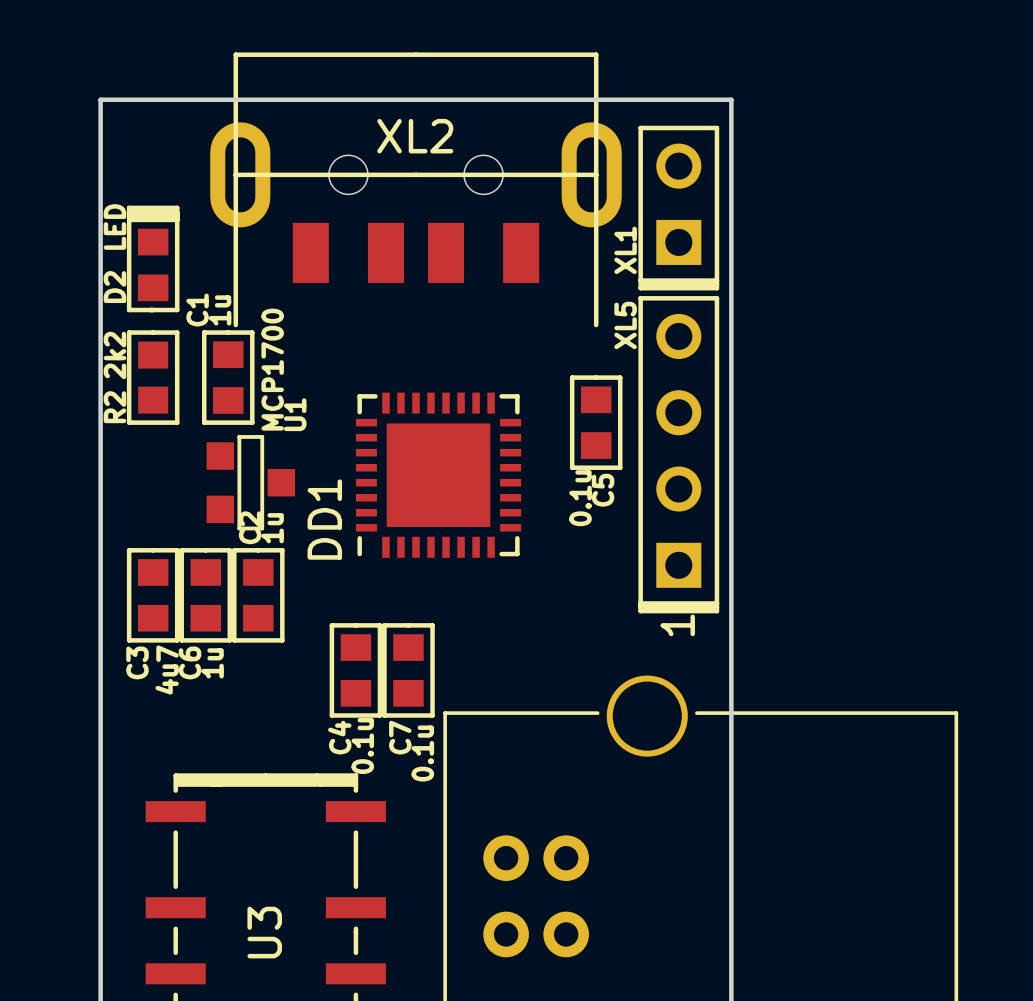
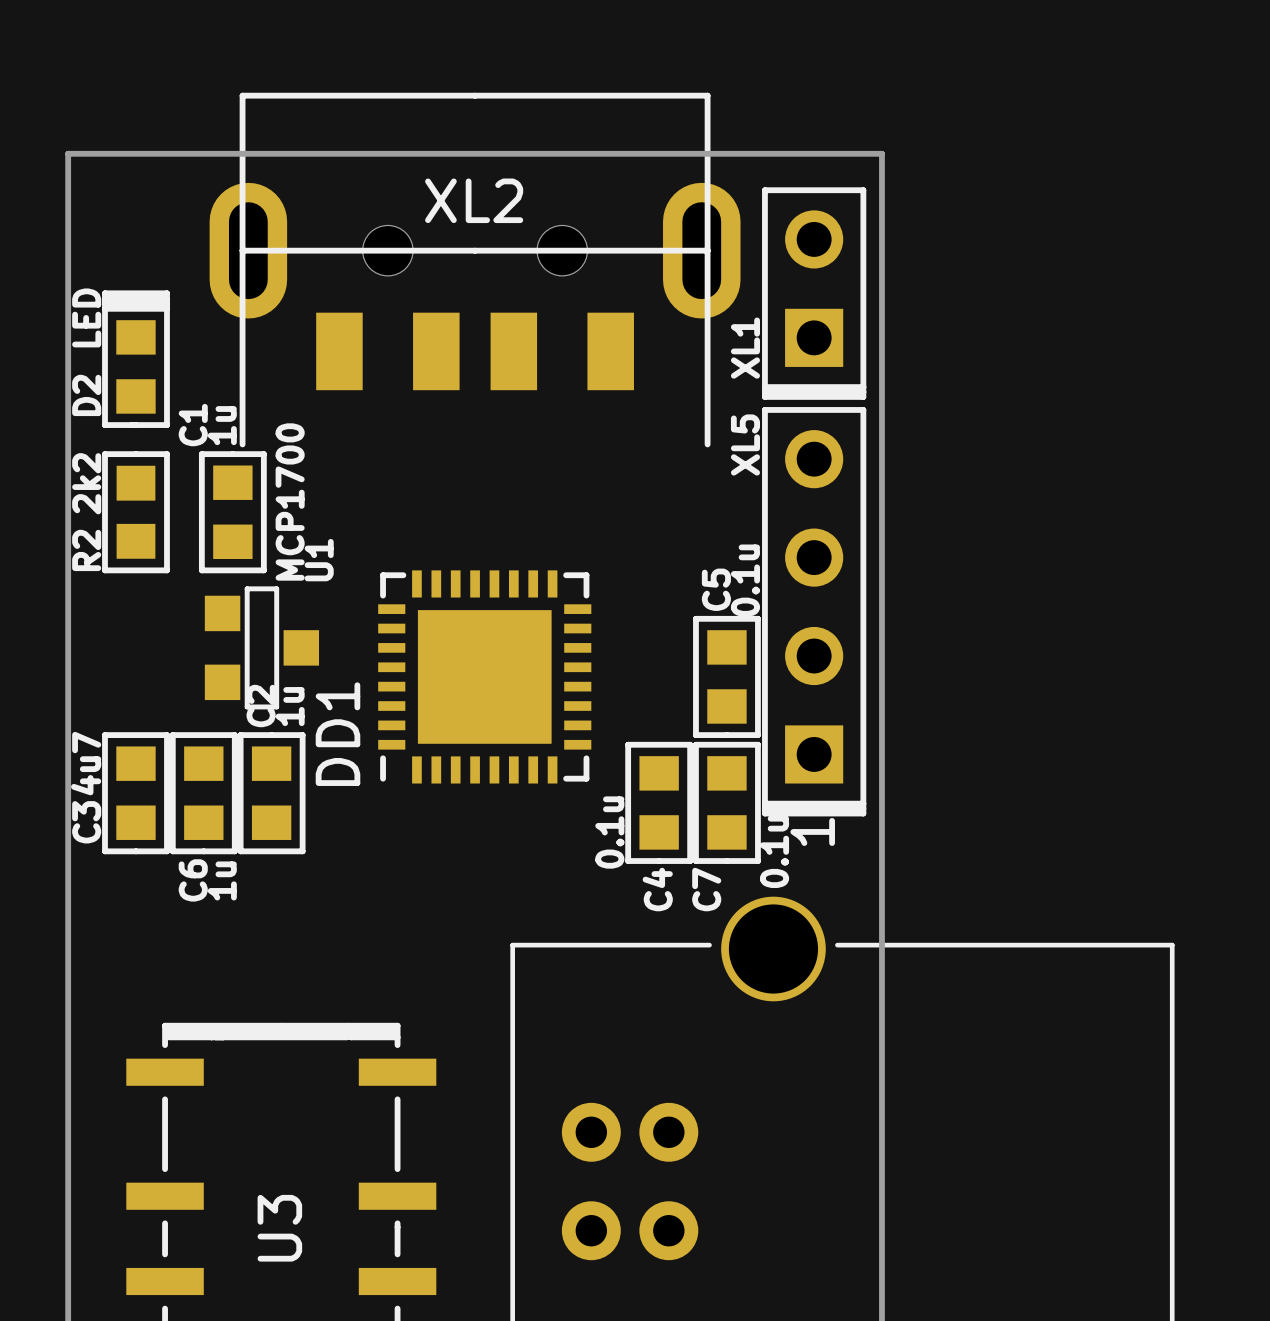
C5 rotation: 0° (596, 422) -> 180° (726, 676)
C5 position: (596, 422) -> (726, 676)
DD1 position: (438, 475) -> (484, 676)
C3 rotation: 0° (153, 595) -> 180° (135, 793)
C6 rotation: 0° (205, 595) -> 180° (203, 793)
C4 rotation: 0° (355, 670) -> 180° (659, 802)
C4 position: (355, 670) -> (659, 802)
C7 rotation: 0° (408, 670) -> 180° (726, 802)
C7 position: (408, 670) -> (726, 802)
C4 value position: 0.1u (362, 745) -> 0.1u (609, 832)

